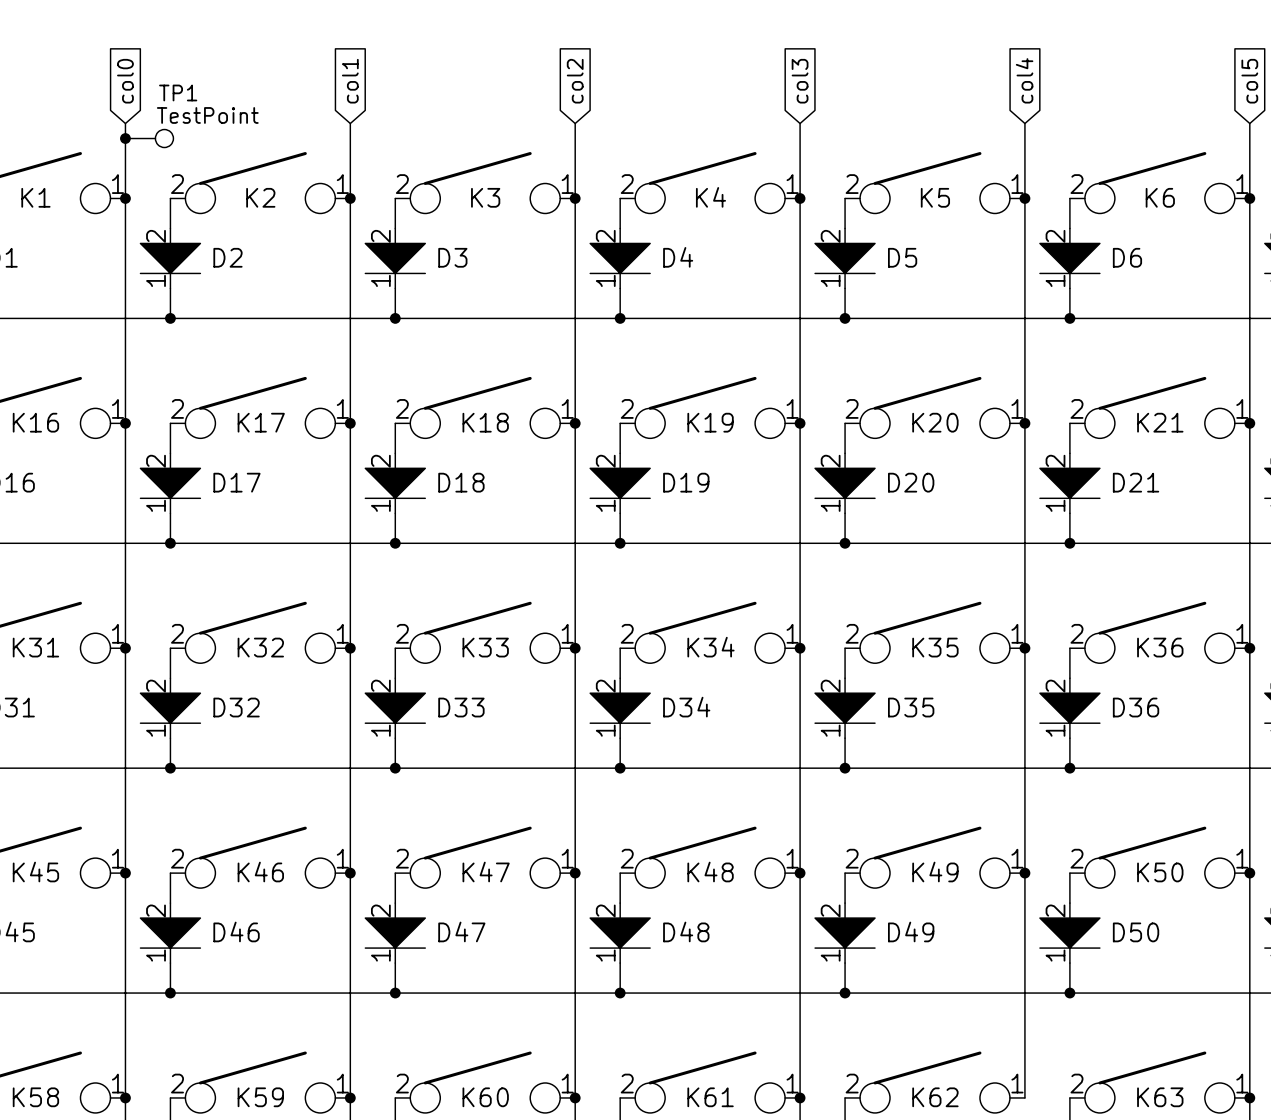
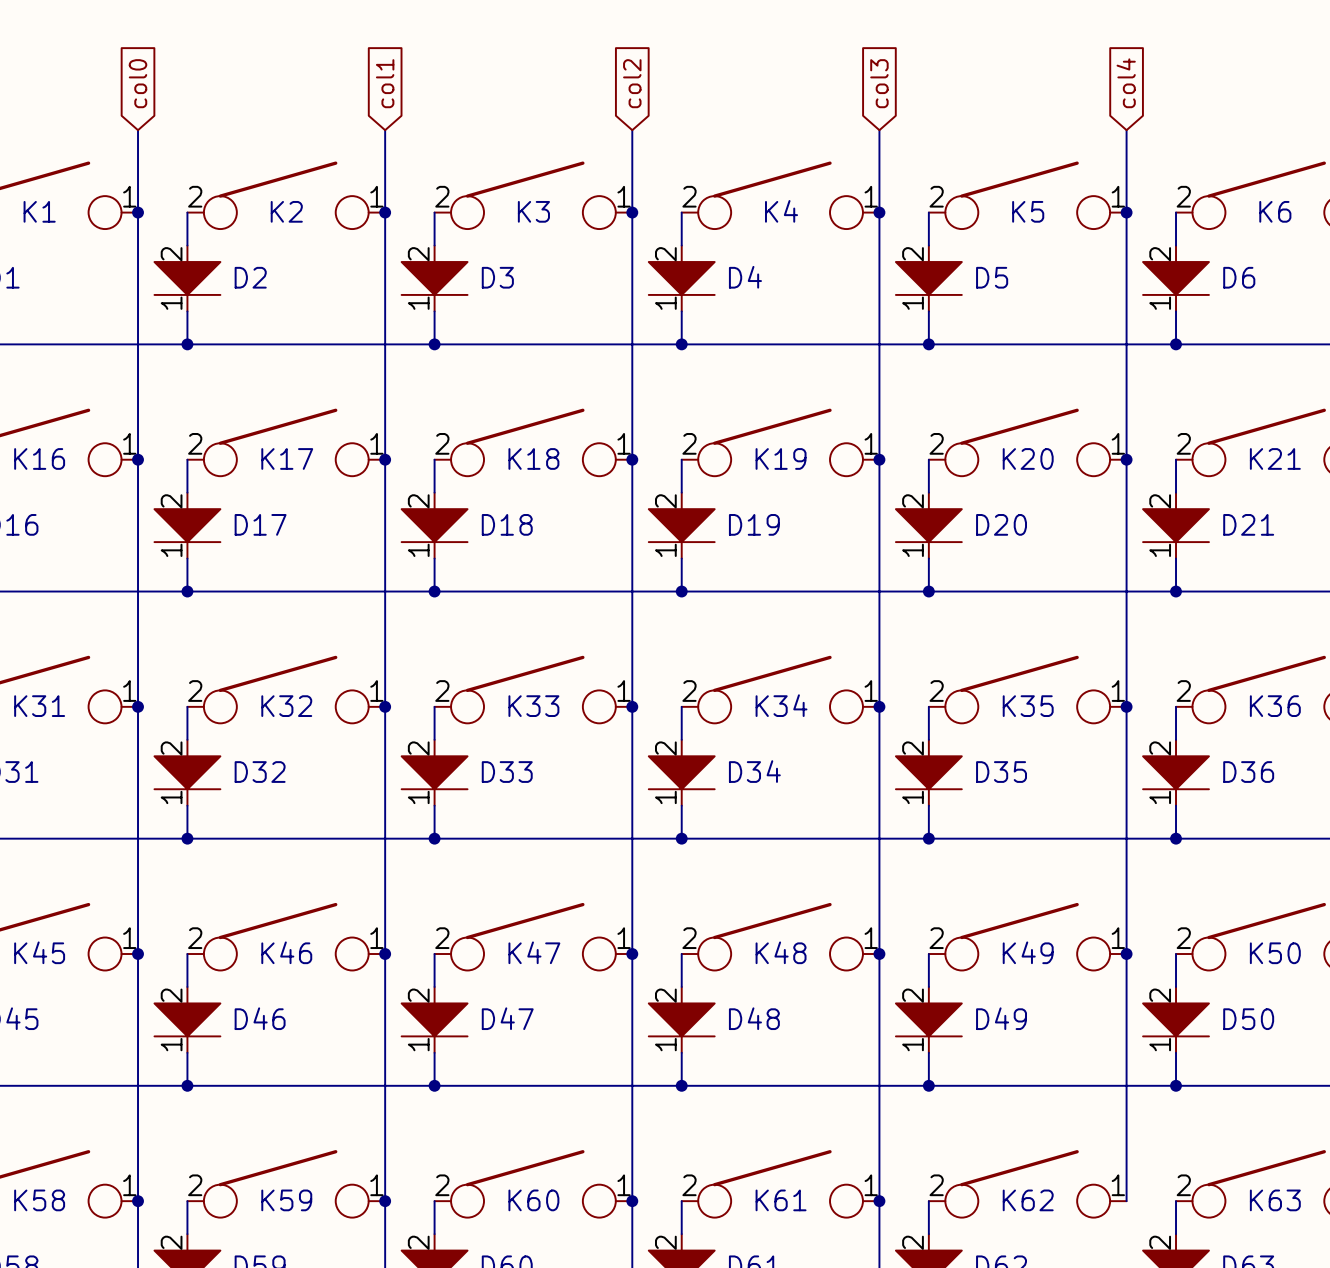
junction: (125, 138) -> none
TP1: TestPoint (149, 138) -> none

